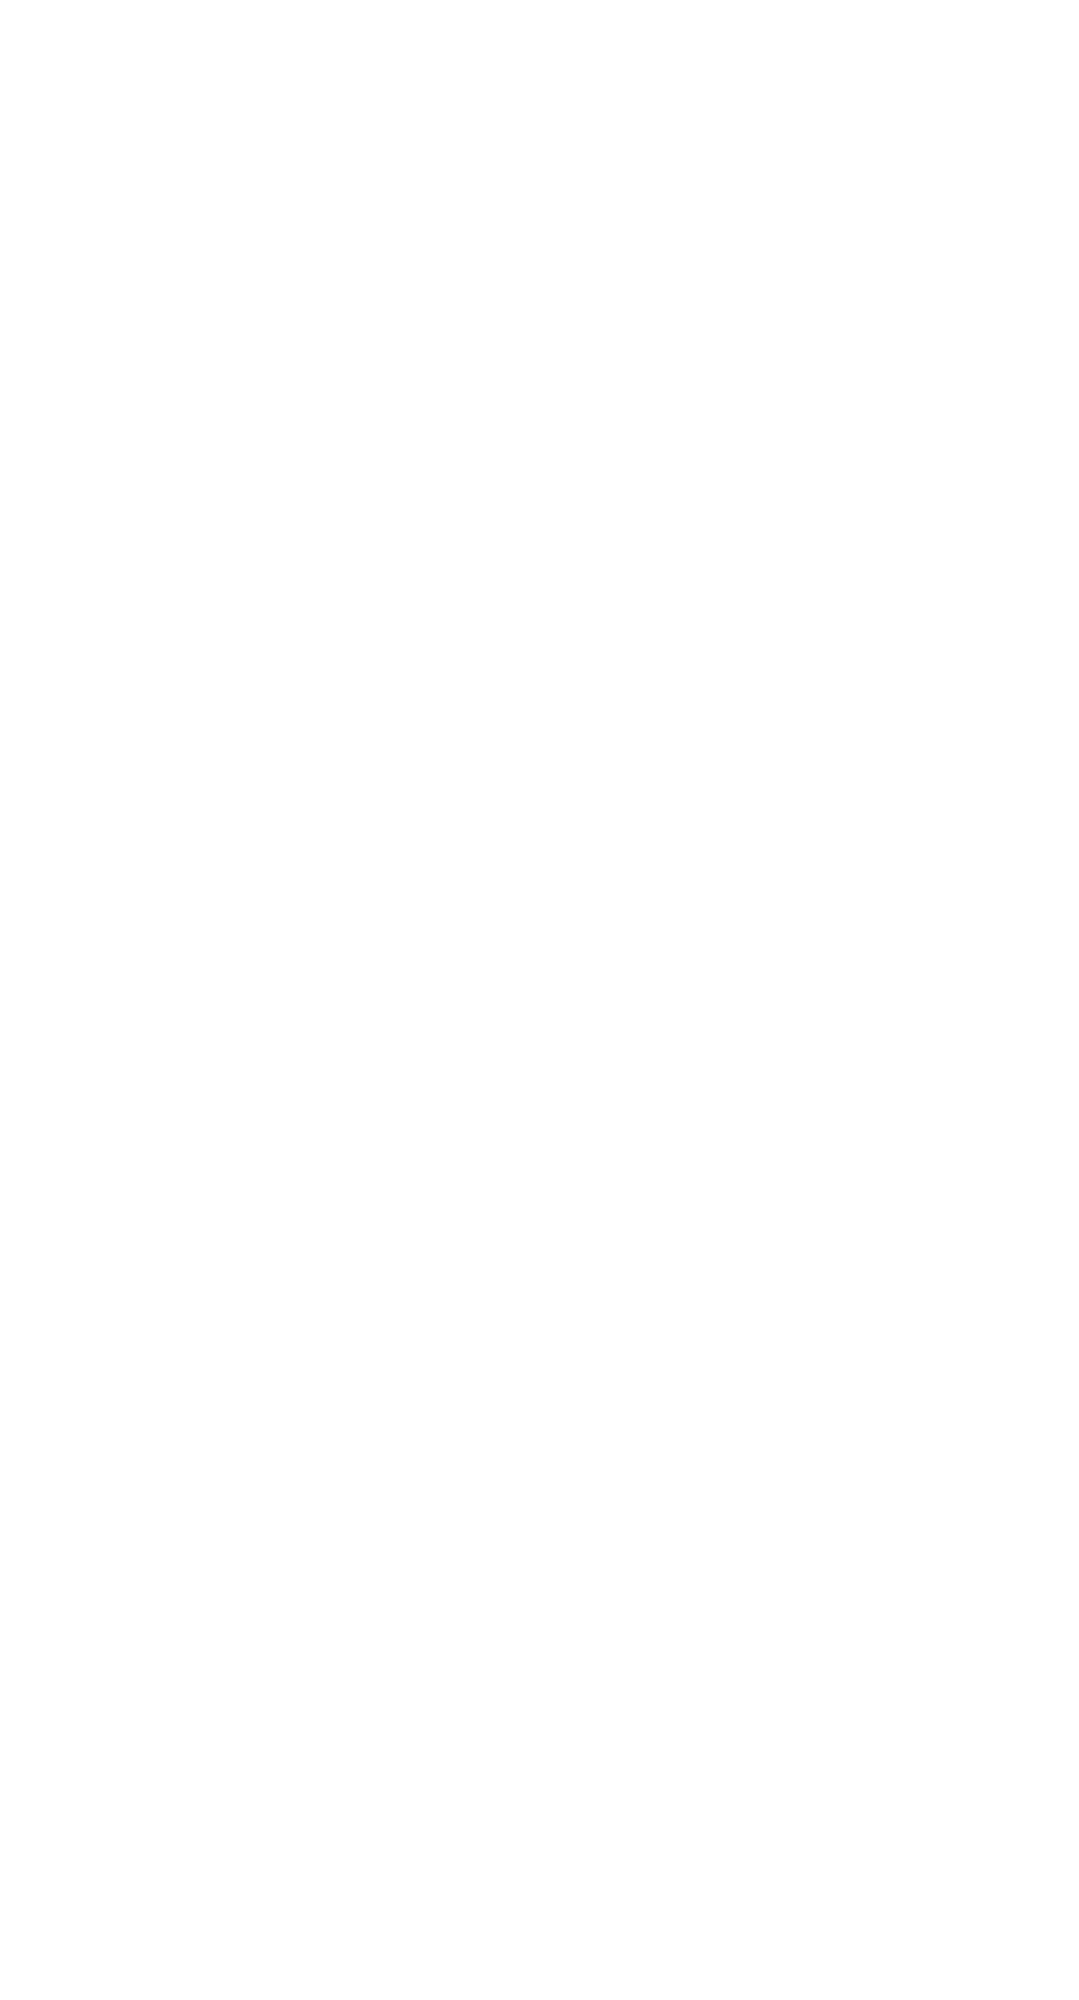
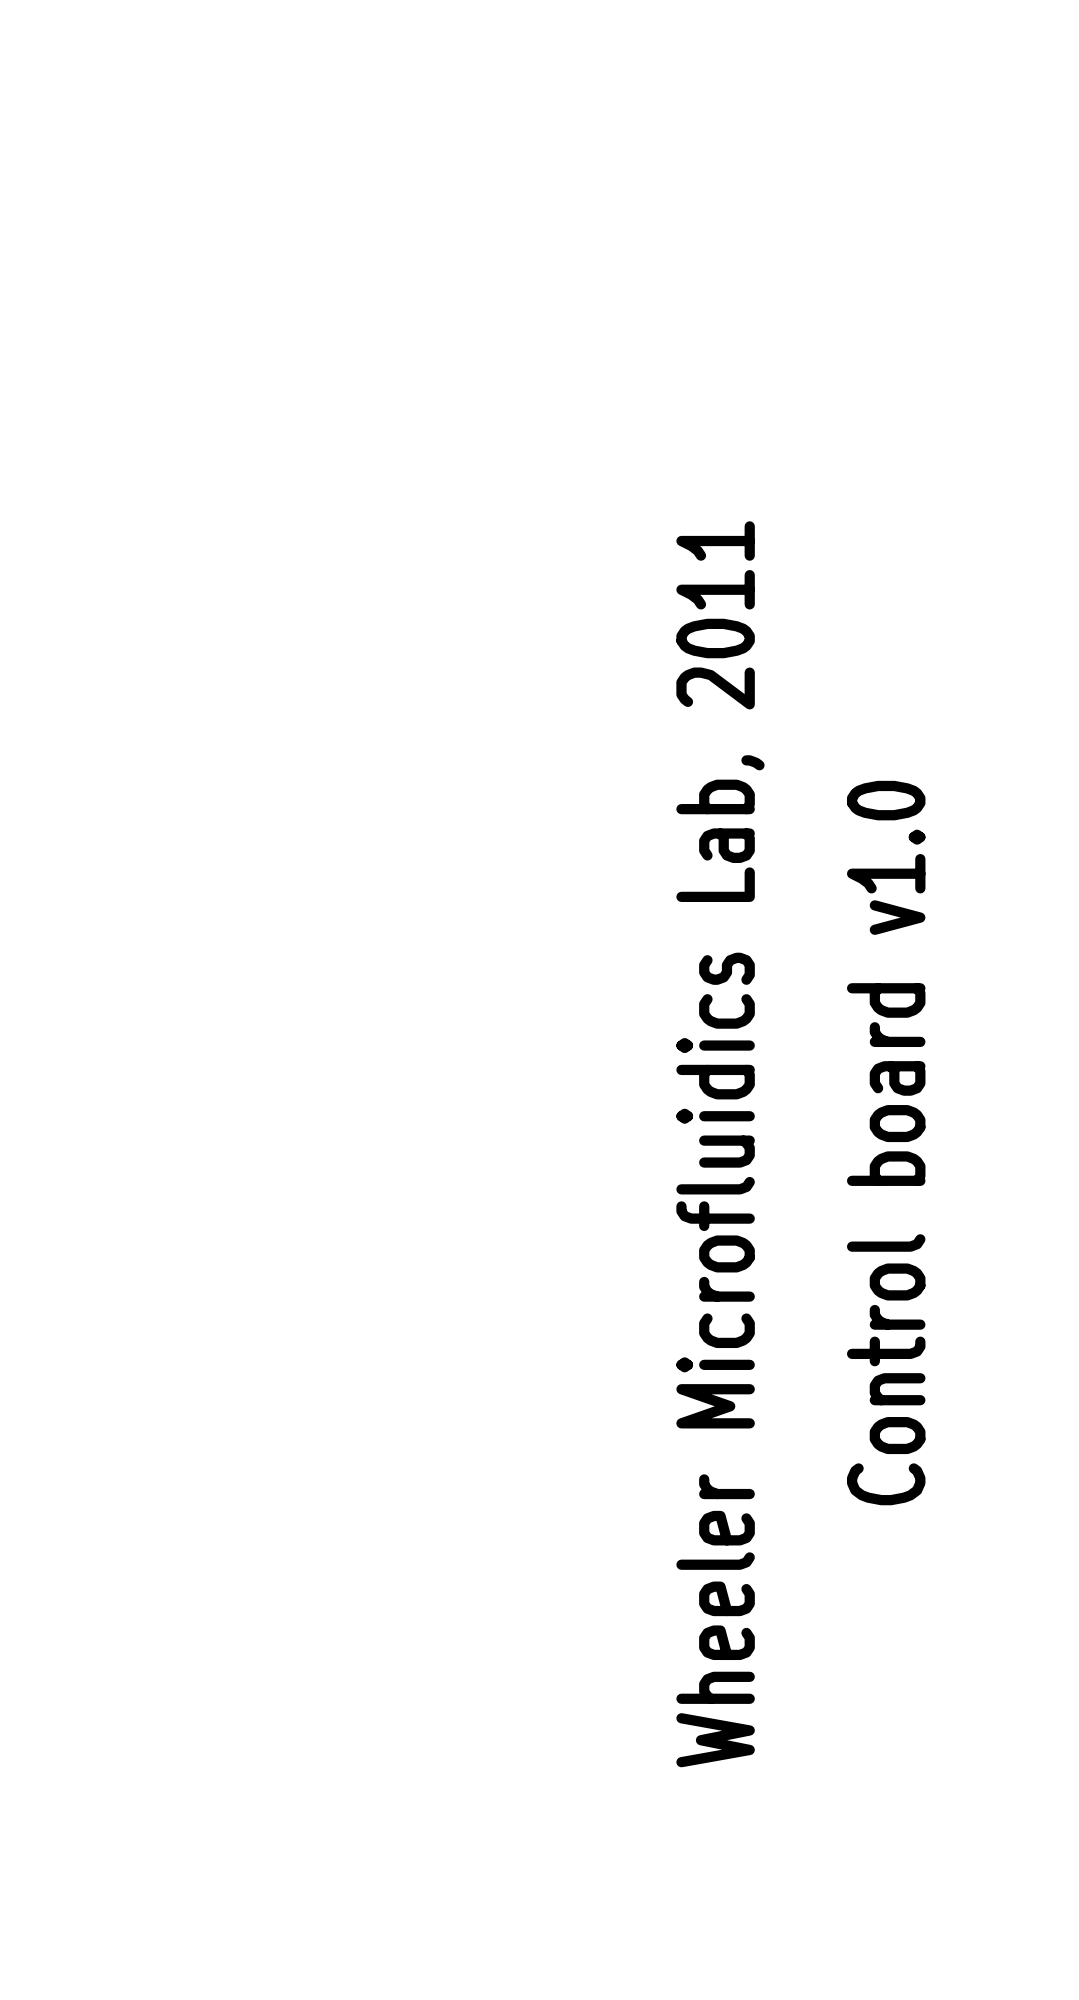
text: none -> Control board v1.0 (886, 1143)
text: none -> Wheeler Microfluidics Lab, 2011 (720, 1144)

